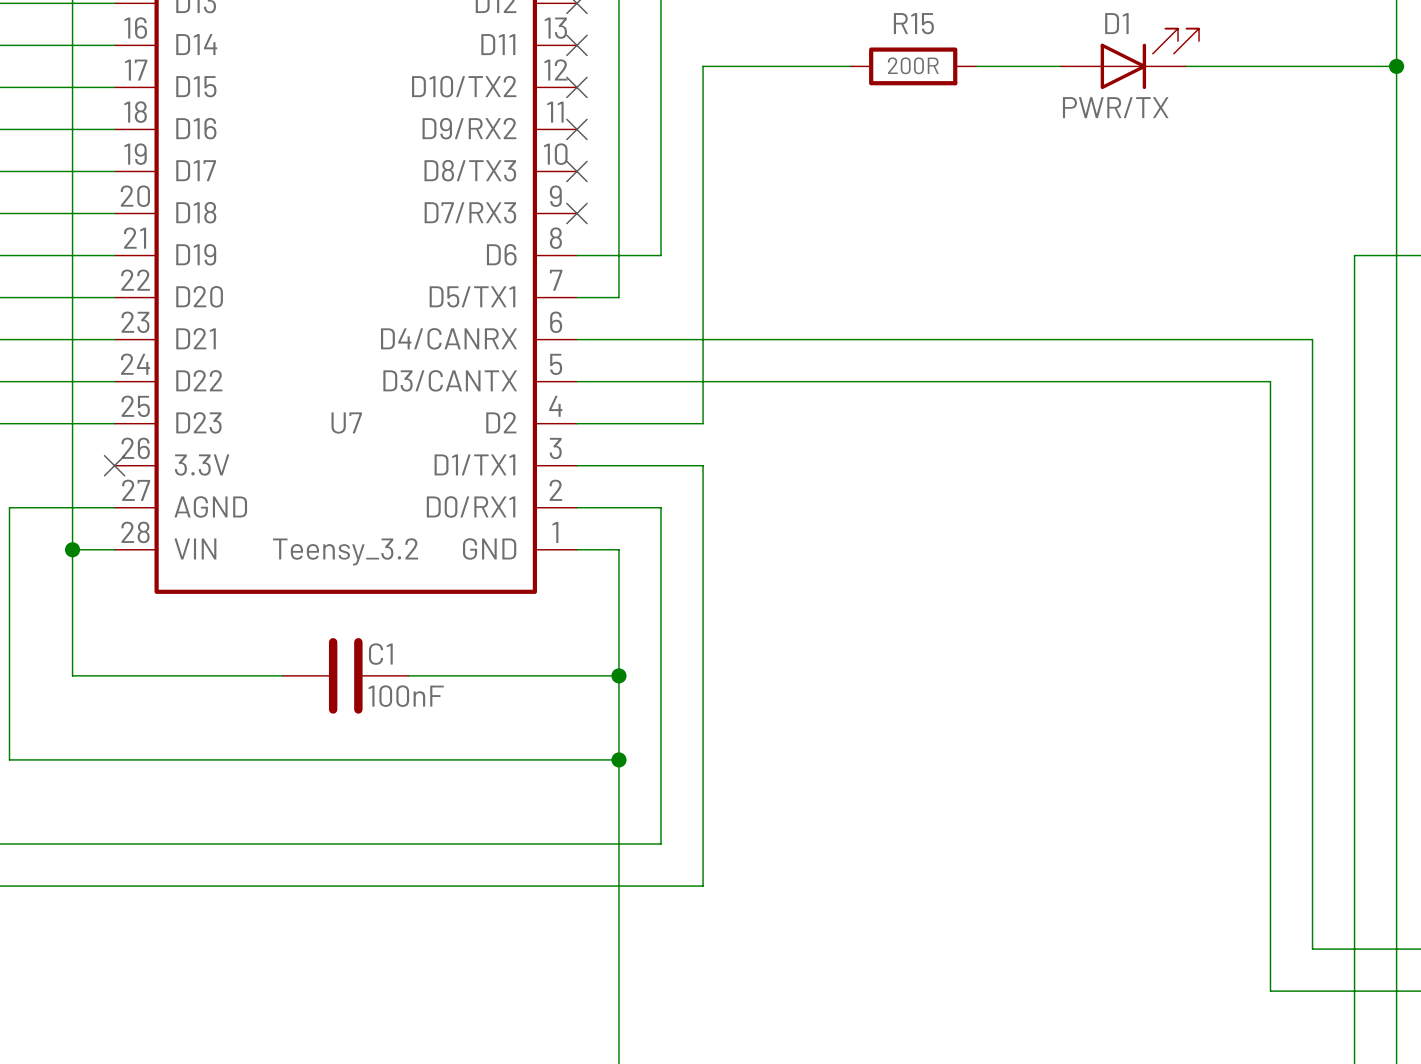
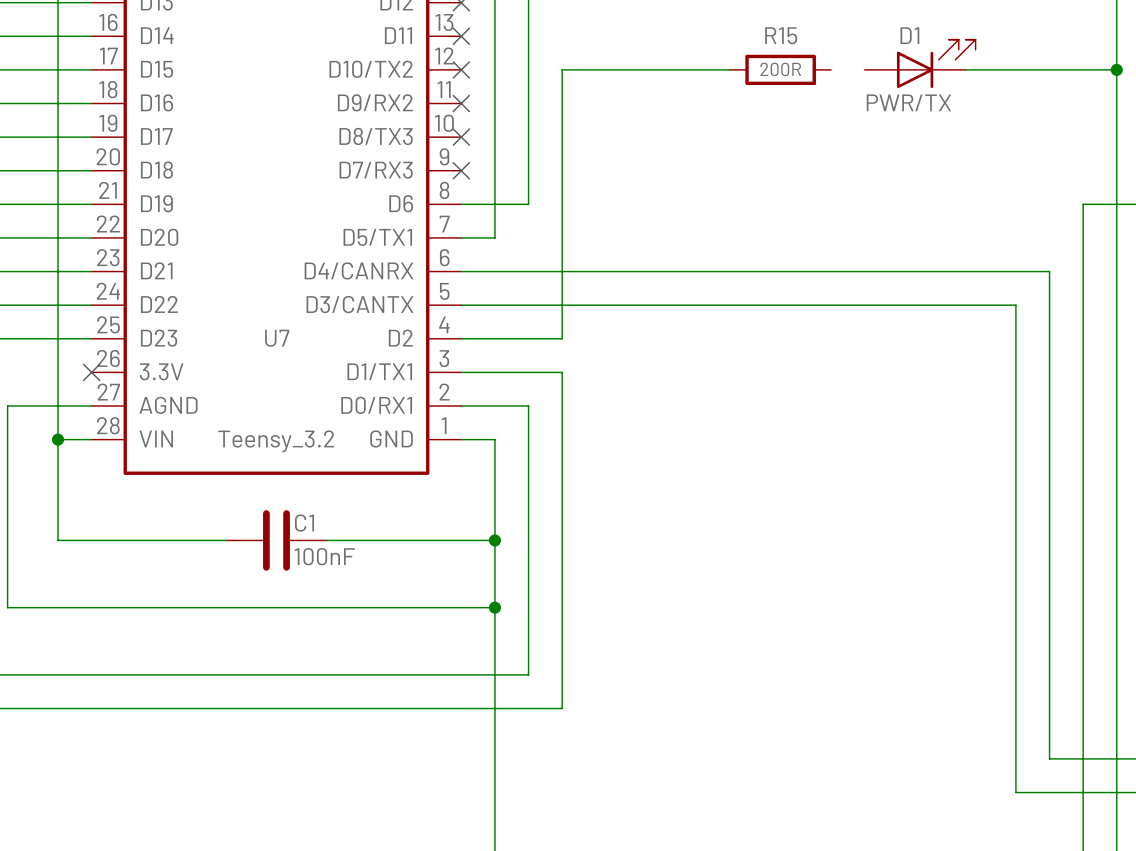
D1 position: (1129, 58) -> (920, 63)
wire: (850, 66) (703, 66) (703, 87) -> (730, 69) (562, 69)
R15 position: (913, 66) -> (780, 69)
wire: (976, 66) (1060, 66) -> none
wire: (1186, 66) (1396, 66) -> none
junction position: (1396, 66) -> (1116, 69)
wire: none -> (965, 69) (1116, 69)

